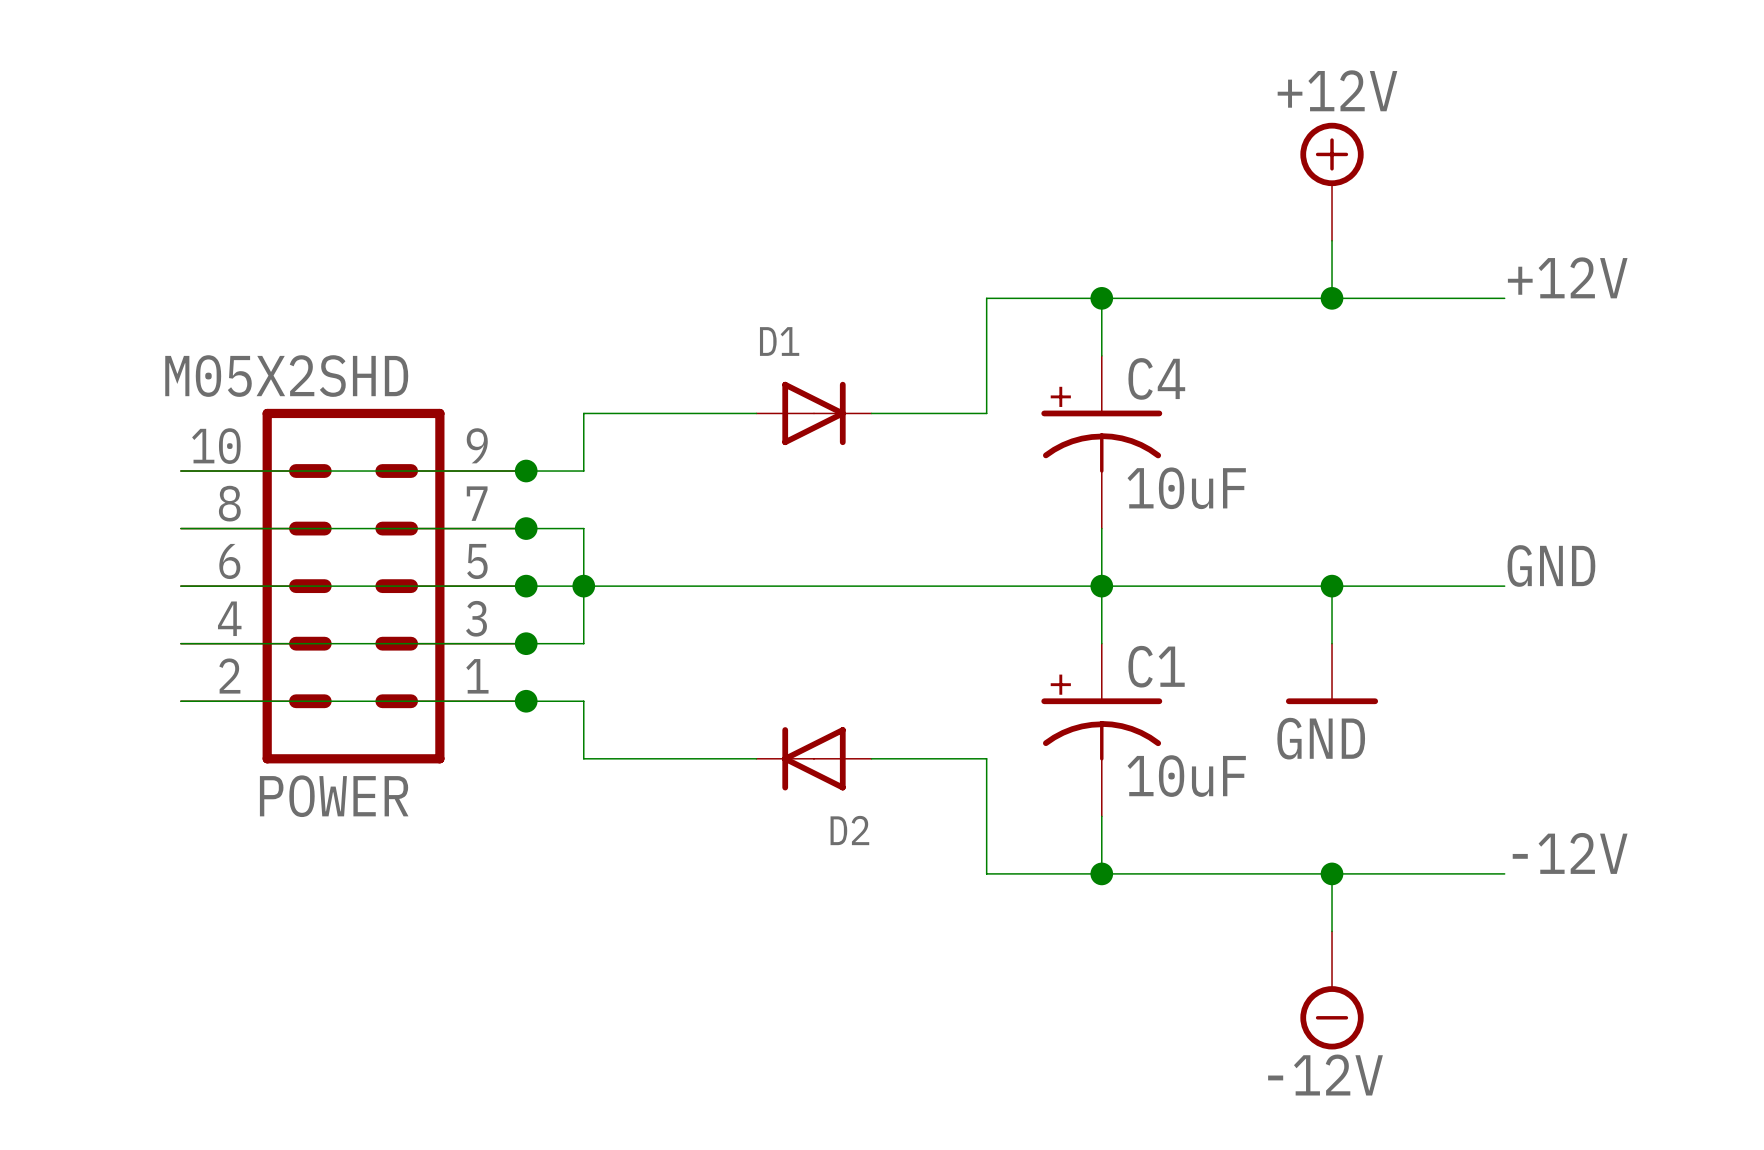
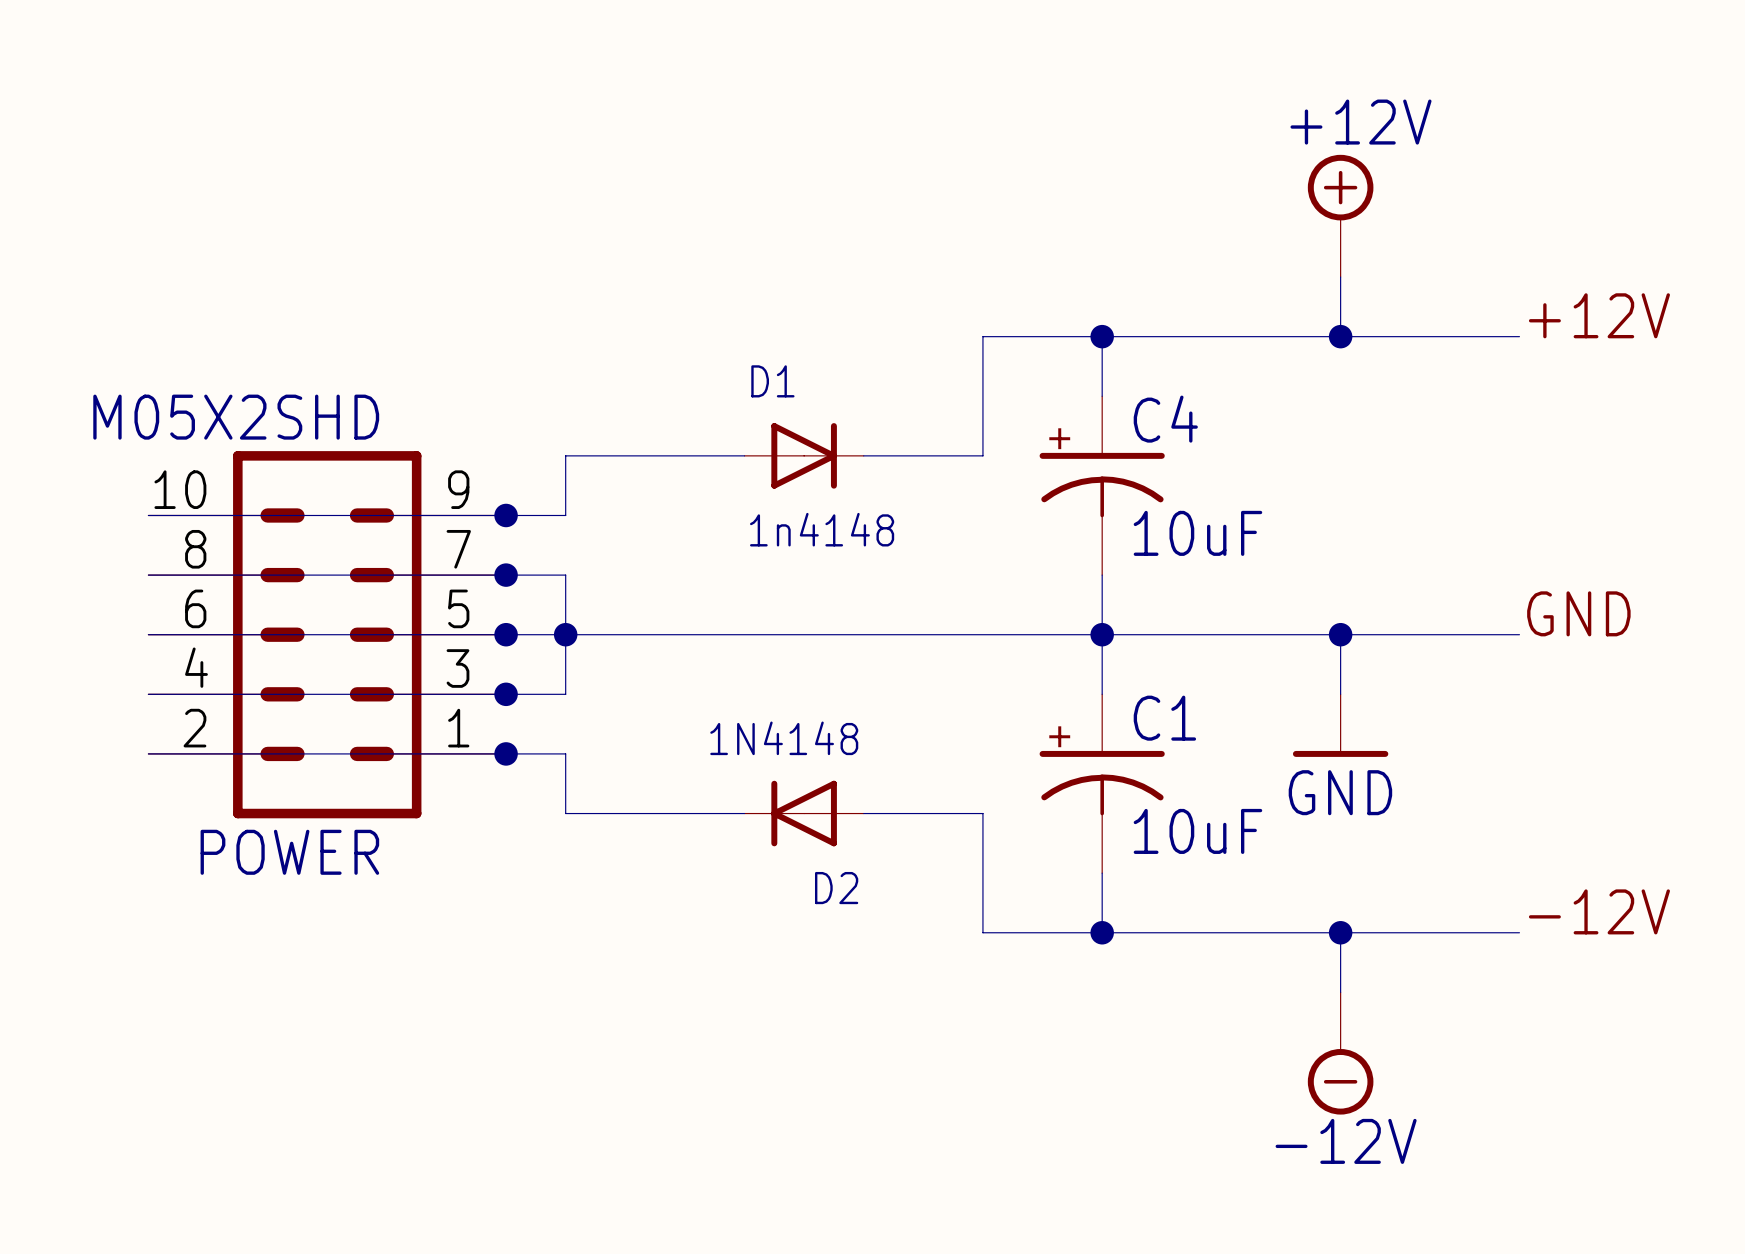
D1 value: none -> 1n4148 (822, 529)
D2 value: none -> 1N4148 (784, 738)

